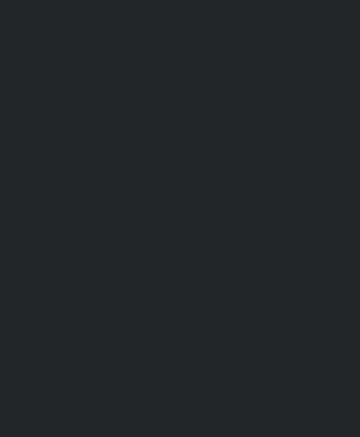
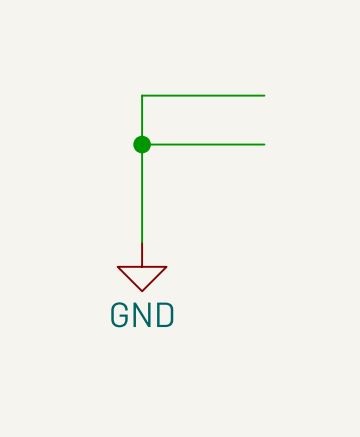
wire: none -> (264, 95) (142, 95) (142, 242)
wire: none -> (142, 144) (264, 144)
junction: none -> (142, 144)
power symbol: none -> GND (142, 266)

